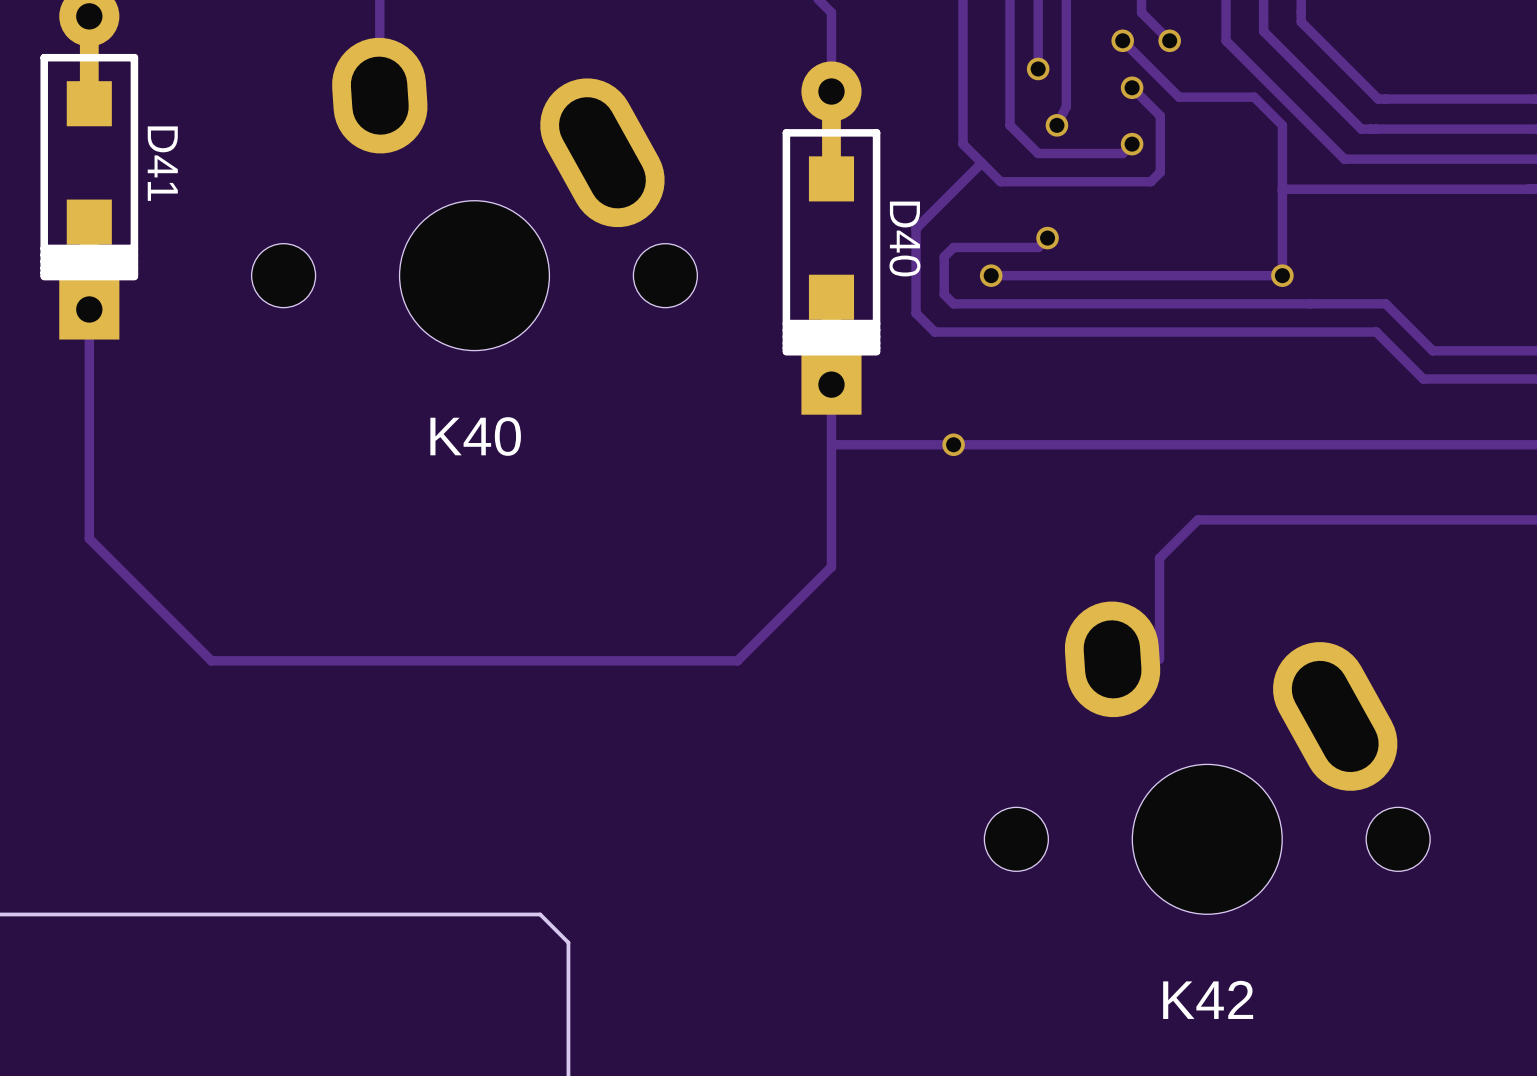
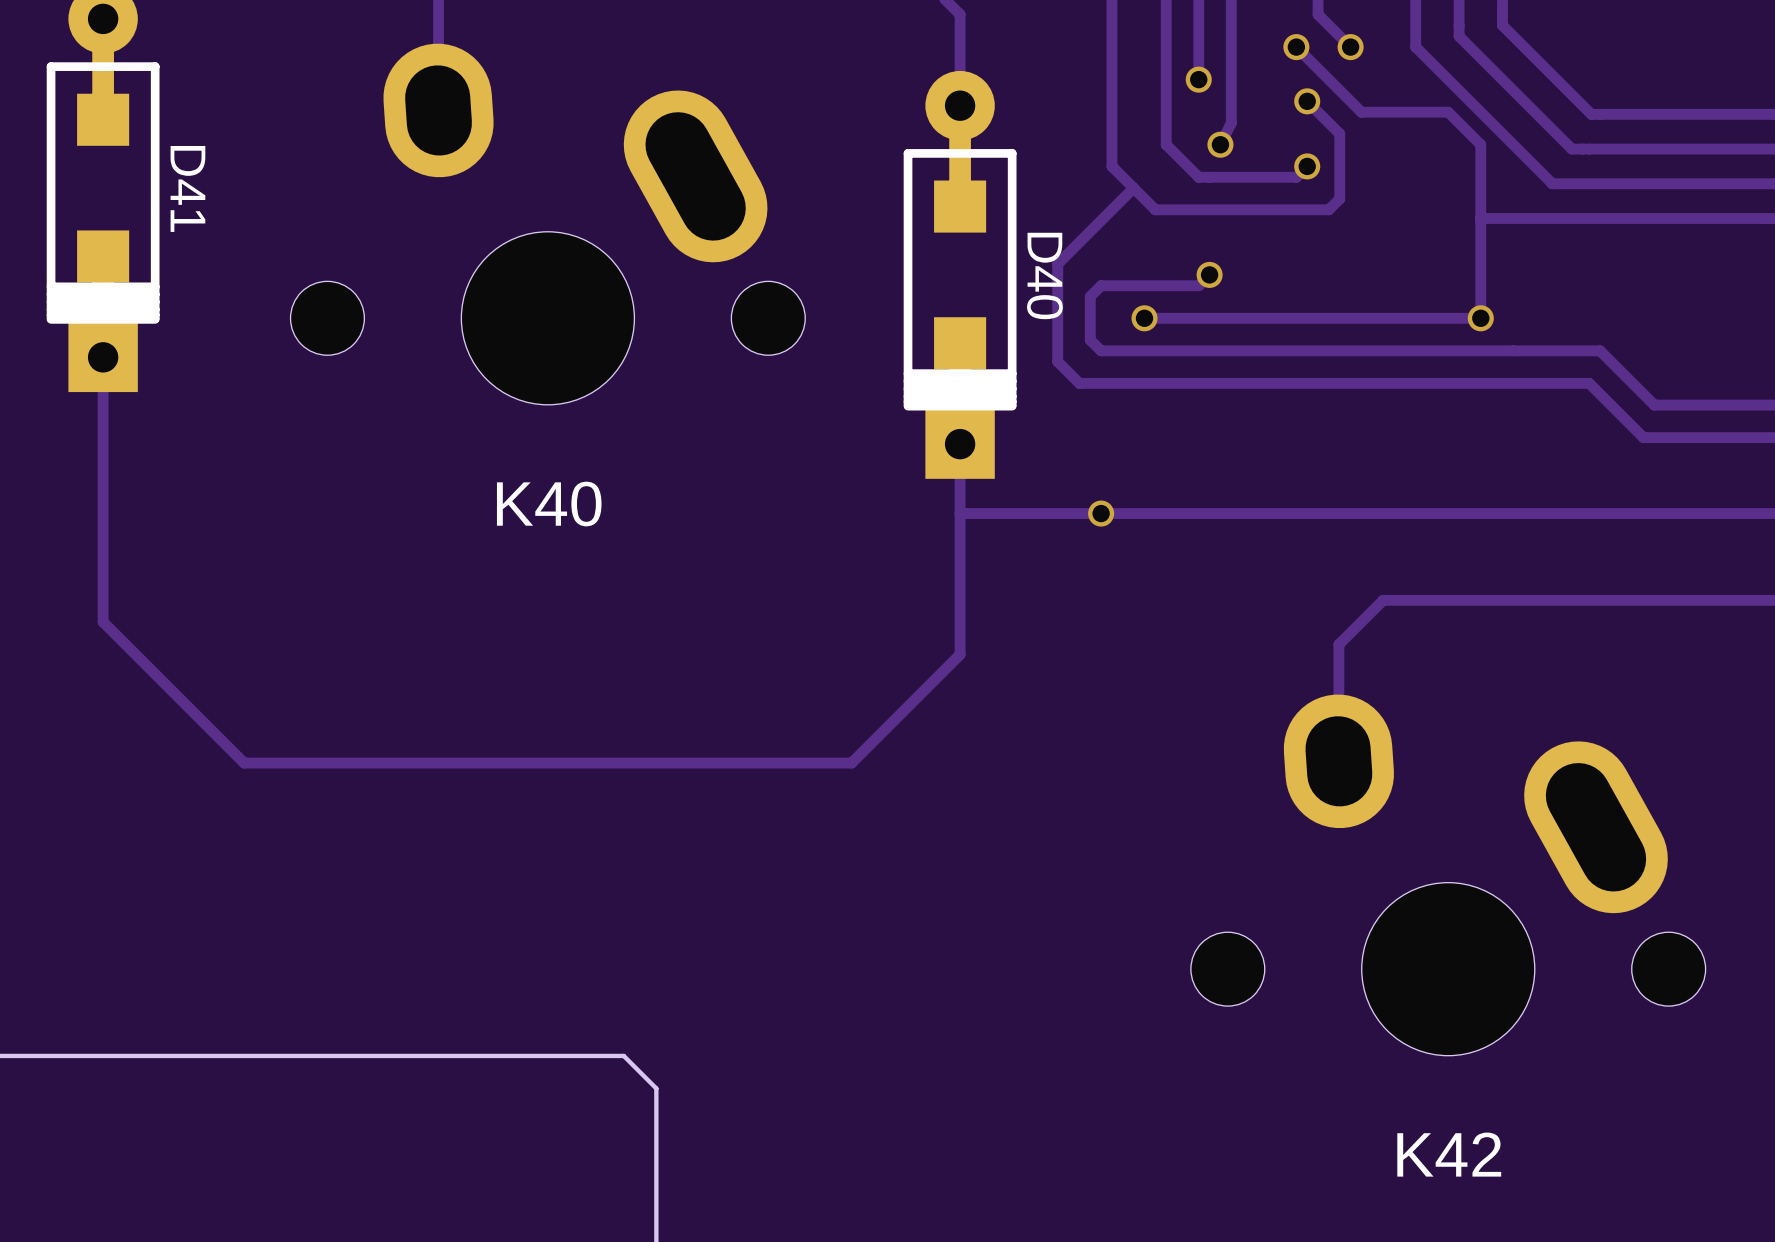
K42 position: (1207, 757) -> (1448, 875)

